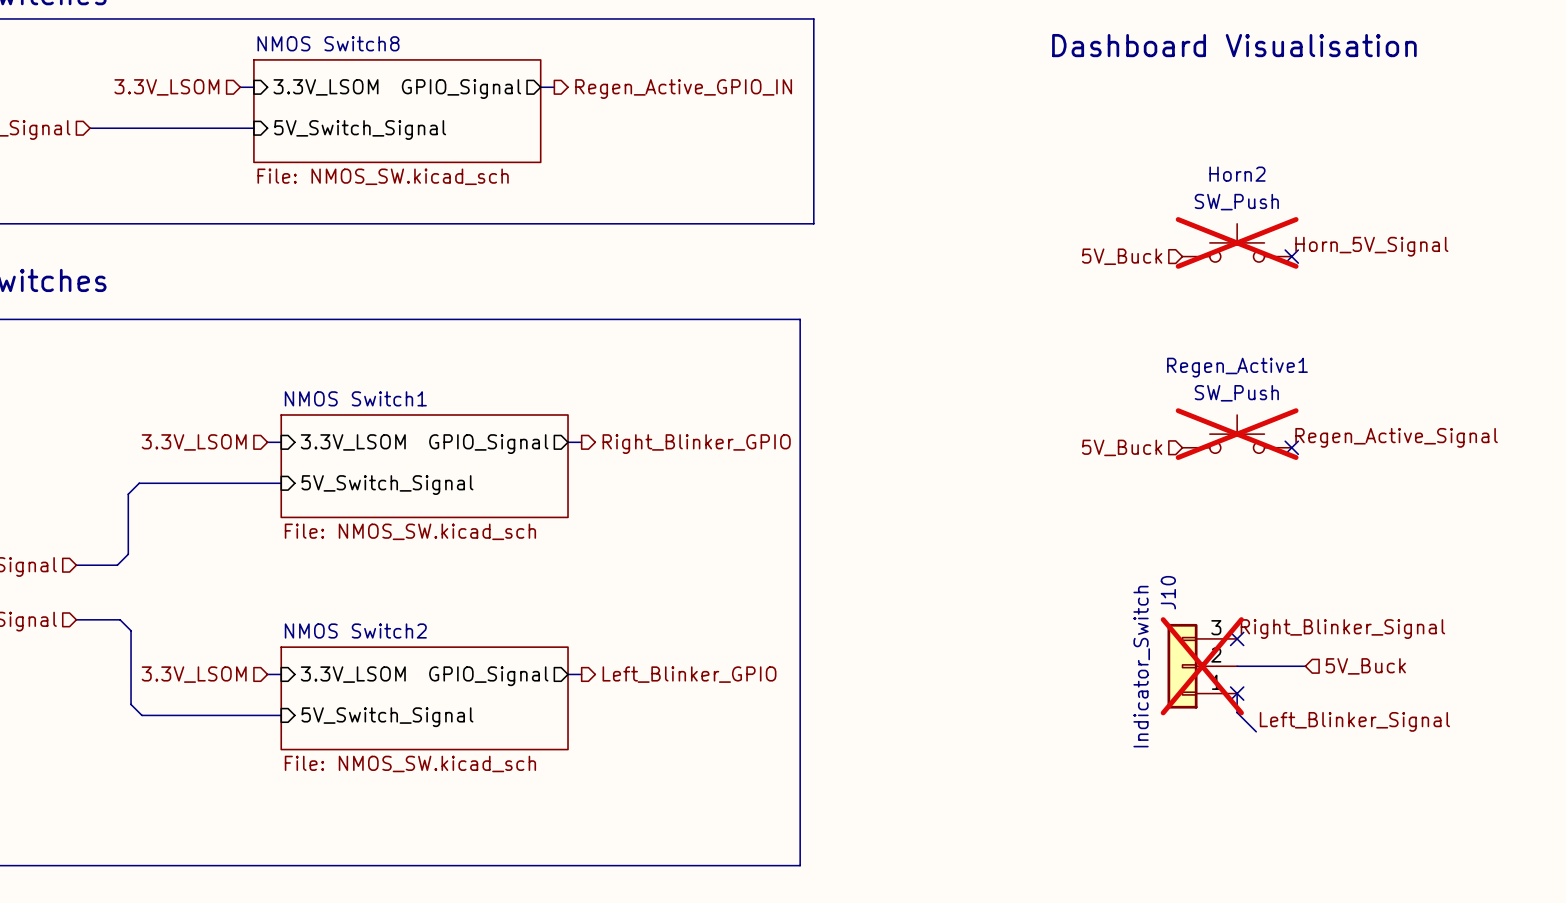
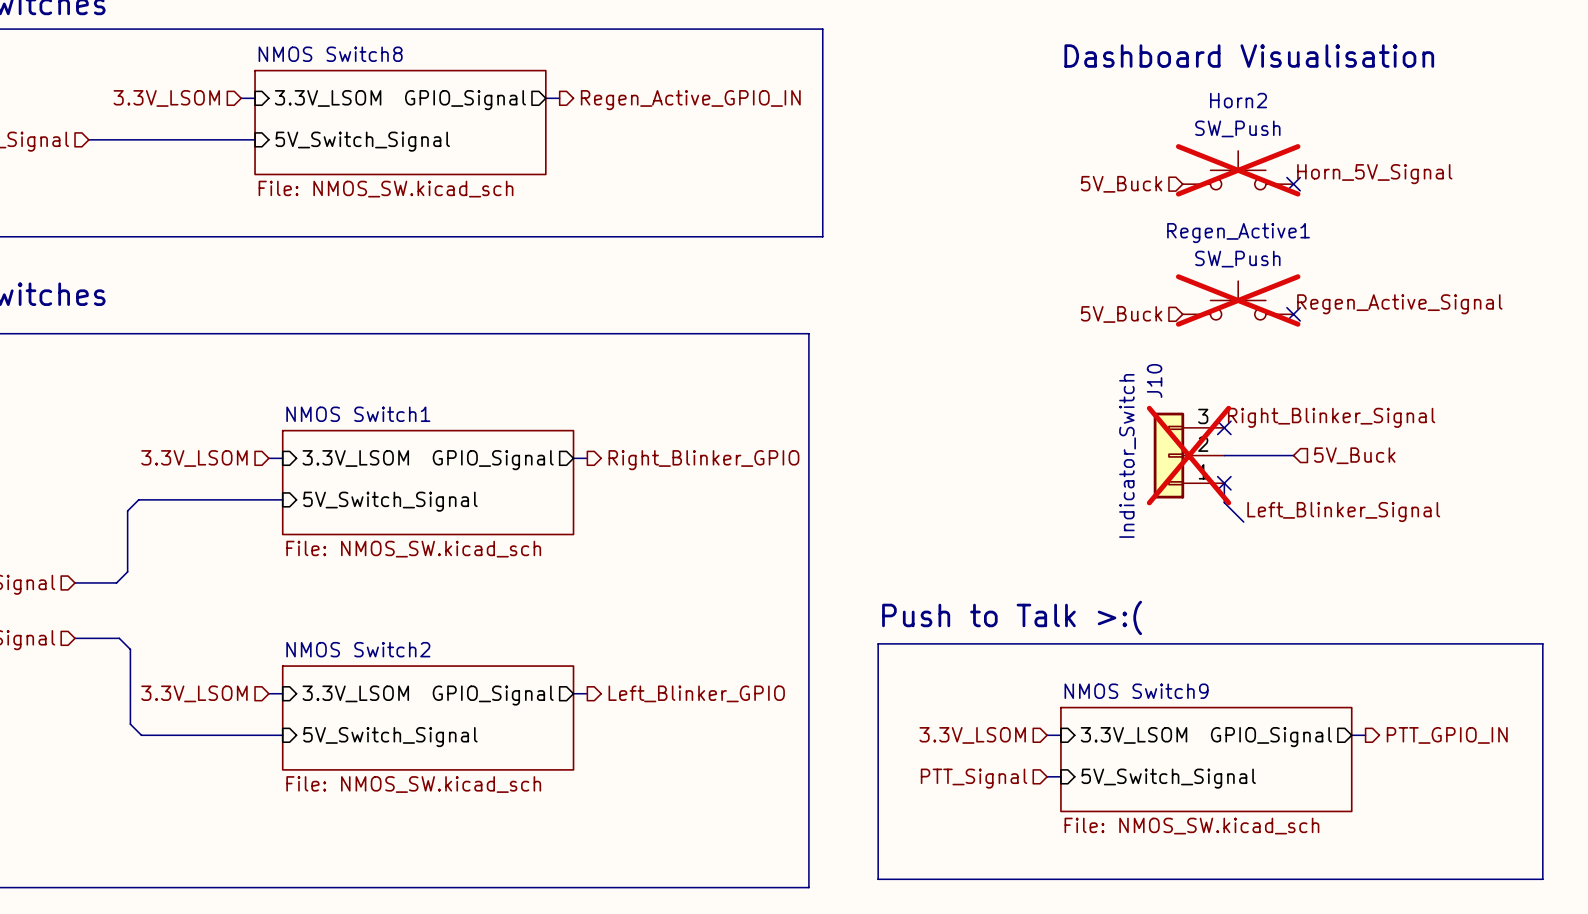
no-connect mark: none -> (1293, 184)
hierarchical label: none -> 5V_Buck (1121, 184)
Horn2 position: (1237, 242) -> (1238, 170)
label position: Horn_5V_Signal (1371, 246) -> Horn_5V_Signal (1374, 174)
hierarchical label: 5V_Buck (1122, 256) -> none
no-connect mark: (1291, 256) -> none
hierarchical label: none -> 5V_Buck (1121, 314)
no-connect mark: none -> (1293, 314)
no-connect mark: none -> (1224, 427)
Regen_Active1 position: (1237, 434) -> (1238, 300)
label position: Regen_Active_Signal (1396, 437) -> Regen_Active_Signal (1399, 304)
hierarchical label: none -> 5V_Buck (1354, 455)
hierarchical label: 5V_Buck (1122, 447) -> none
no-connect mark: (1291, 447) -> none
no-connect mark: none -> (1224, 483)
text: none -> Push to Talk >:( (1012, 617)
line: none -> (878, 643) (1542, 643) (1542, 879) (878, 879) (878, 643)
label position: Right_Blinker_Signal (1342, 629) -> Right_Blinker_Signal (1331, 417)
no-connect mark: (1237, 638) -> none
J10 position: (1202, 666) -> (1189, 455)
wire: (1237, 666) (1305, 666) -> (1224, 455) (1293, 455)
hierarchical label: 5V_Buck (1365, 666) -> none
wire: (1237, 693) (1237, 712) (1256, 731) -> (1224, 483) (1224, 502) (1243, 522)
no-connect mark: (1237, 693) -> none
hierarchical label: none -> 3.3V_LSOM (972, 735)
wire: none -> (1047, 735) (1060, 735)
sheet pin: none -> 3.3V_LSOM (1134, 735)
wire: none -> (1351, 735) (1365, 735)
hierarchical label: none -> PTT_GPIO_IN (1447, 735)
sheet pin: none -> GPIO_Signal (1271, 737)
label position: Left_Blinker_Signal (1354, 721) -> Left_Blinker_Signal (1343, 511)
sheet NMOS Switch9: none -> File: NMOS_SW.kicad_sch (1206, 759)
wire: none -> (1047, 776) (1060, 776)
hierarchical label: none -> PTT_Signal (974, 778)
sheet pin: none -> 5V_Switch_Signal (1168, 778)

